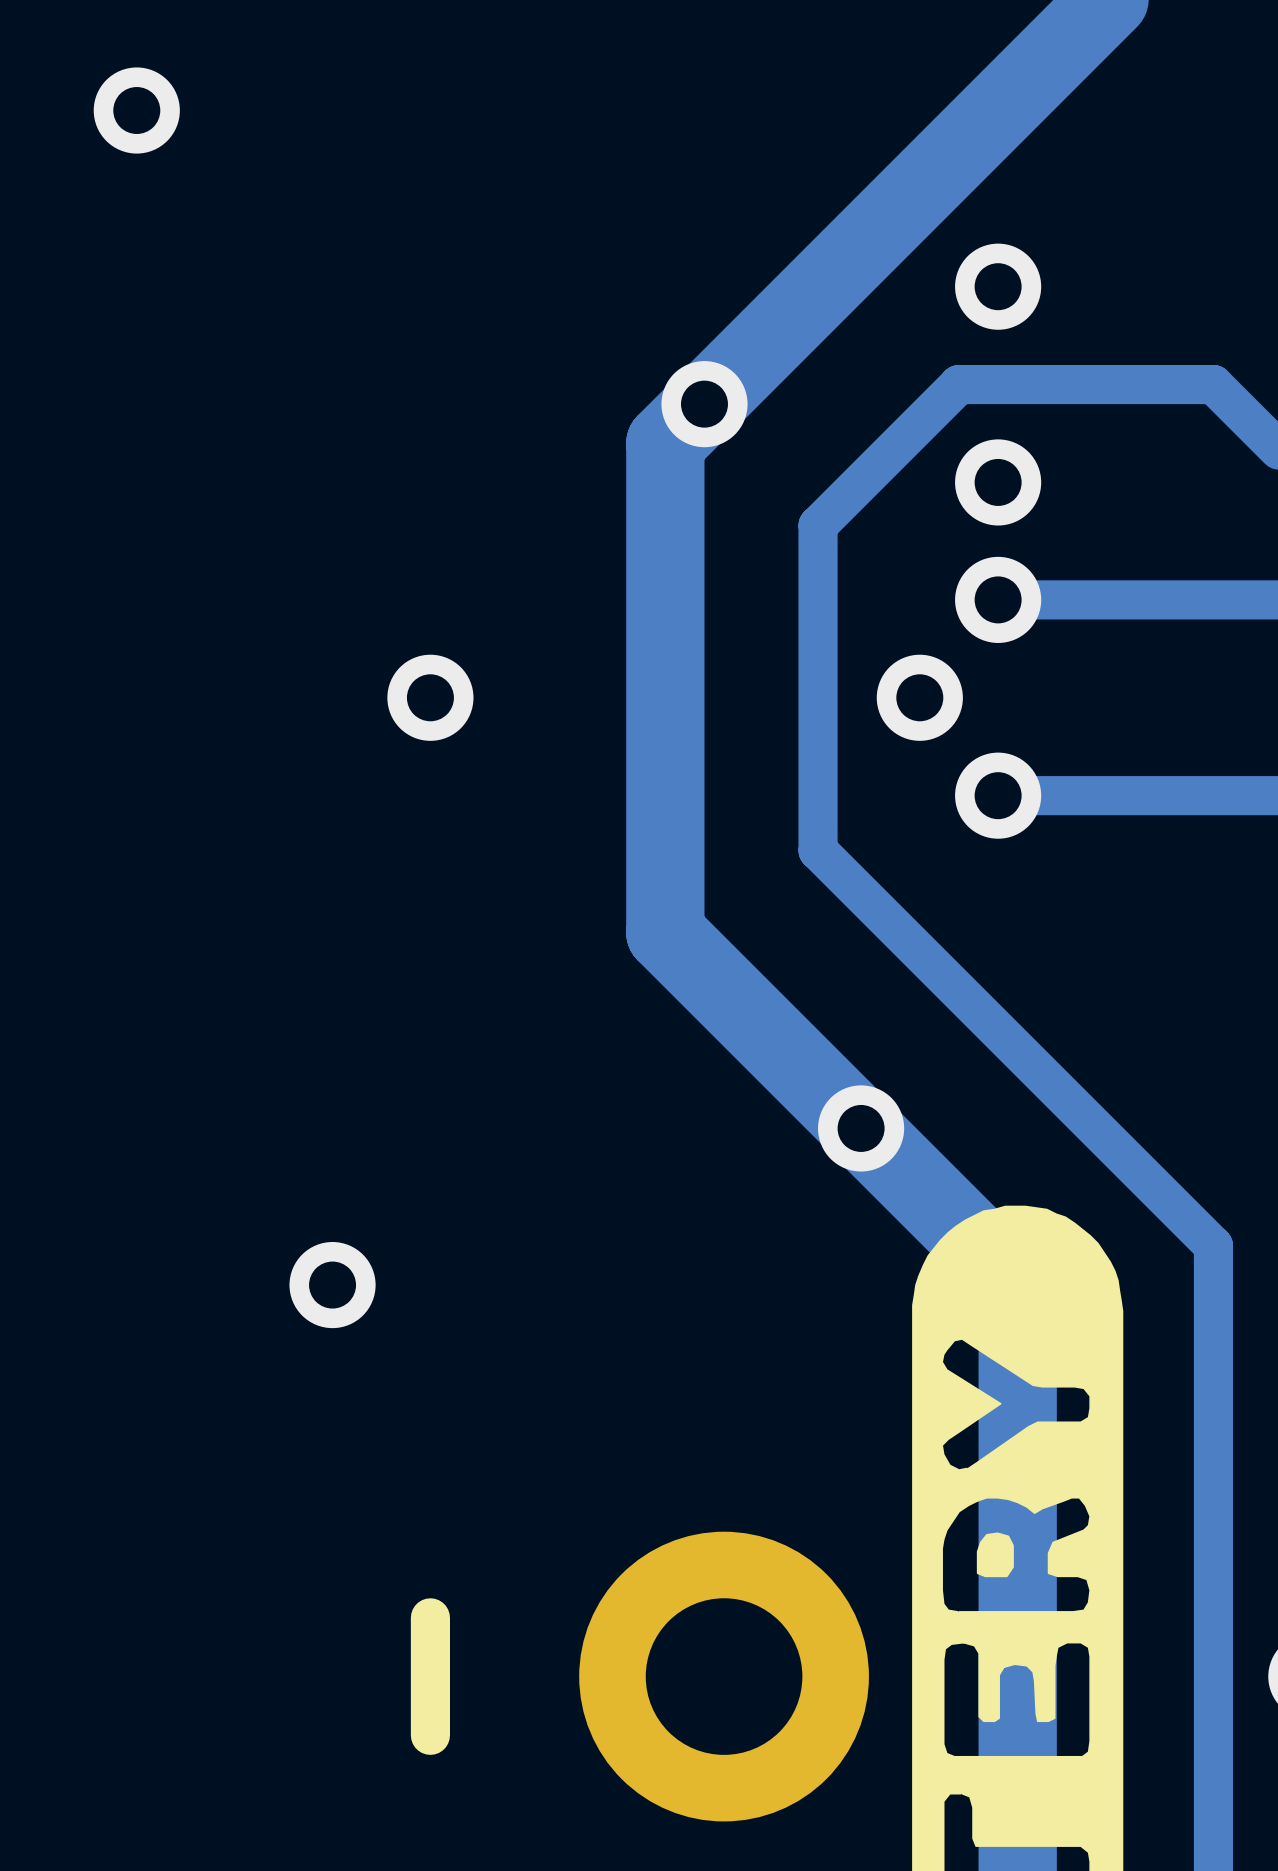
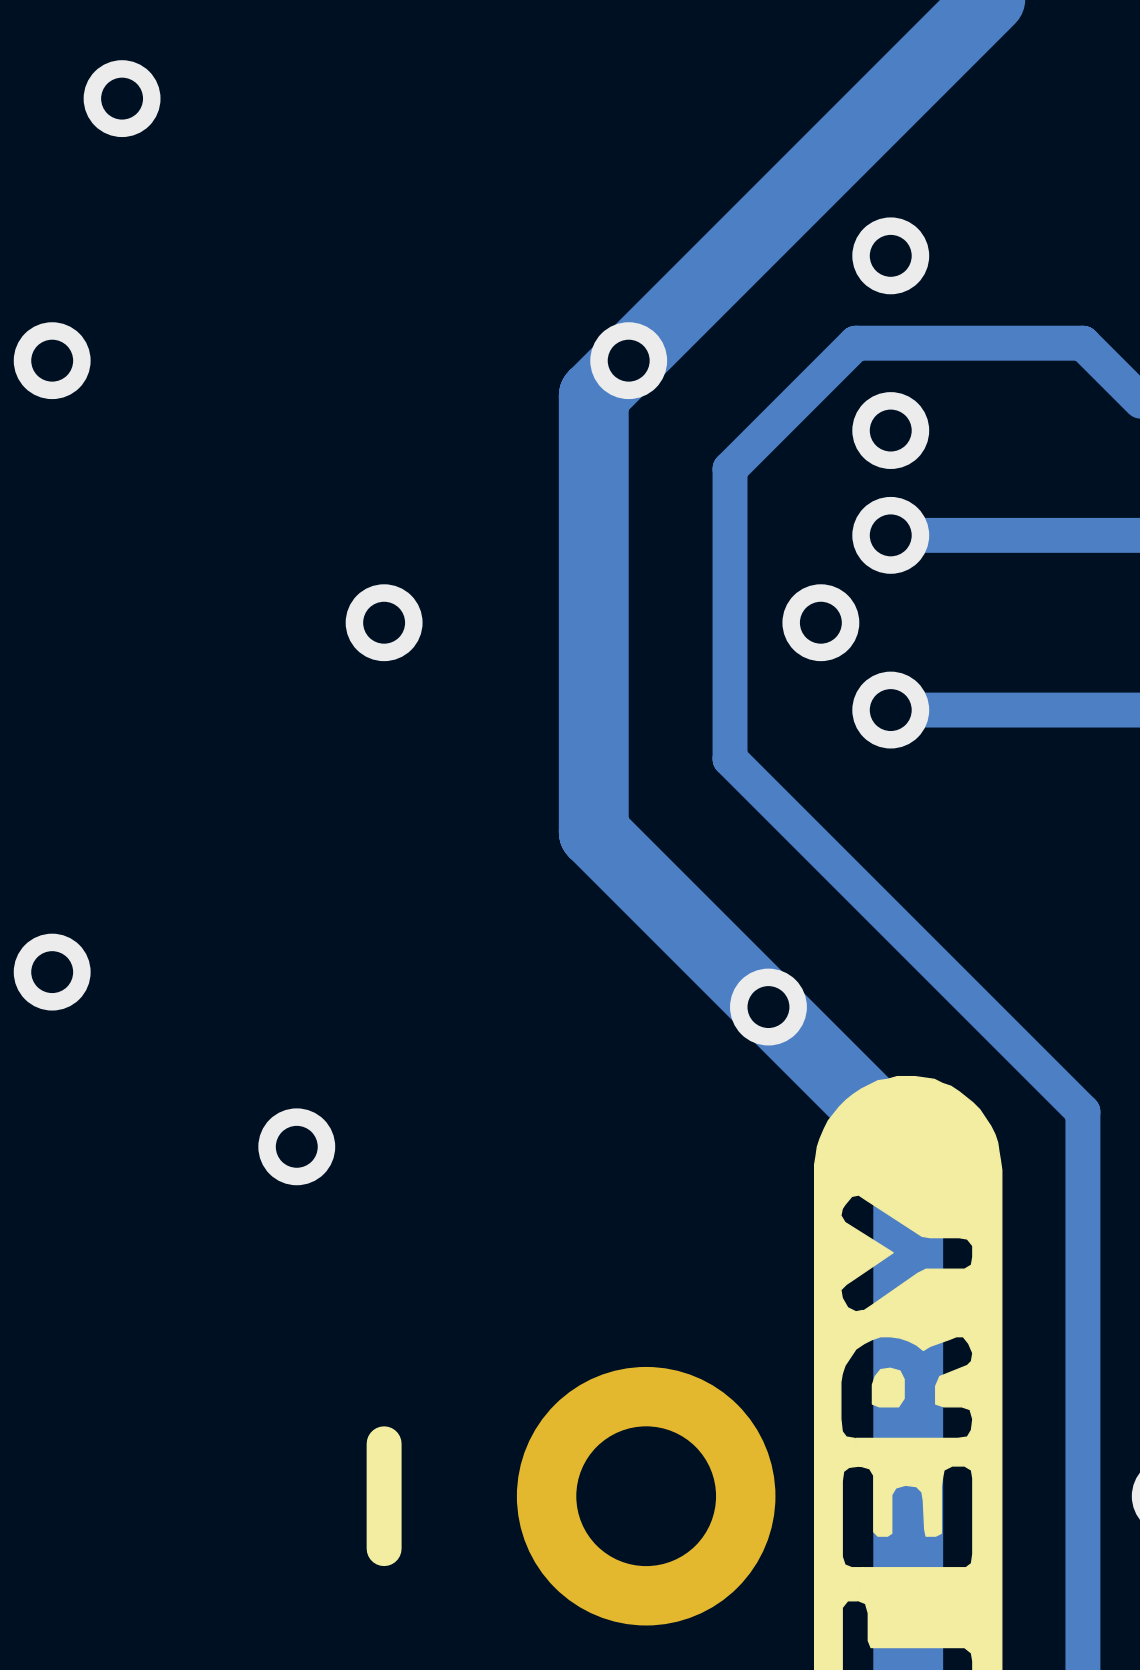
via: none -> (52, 360)
via: none -> (52, 972)

